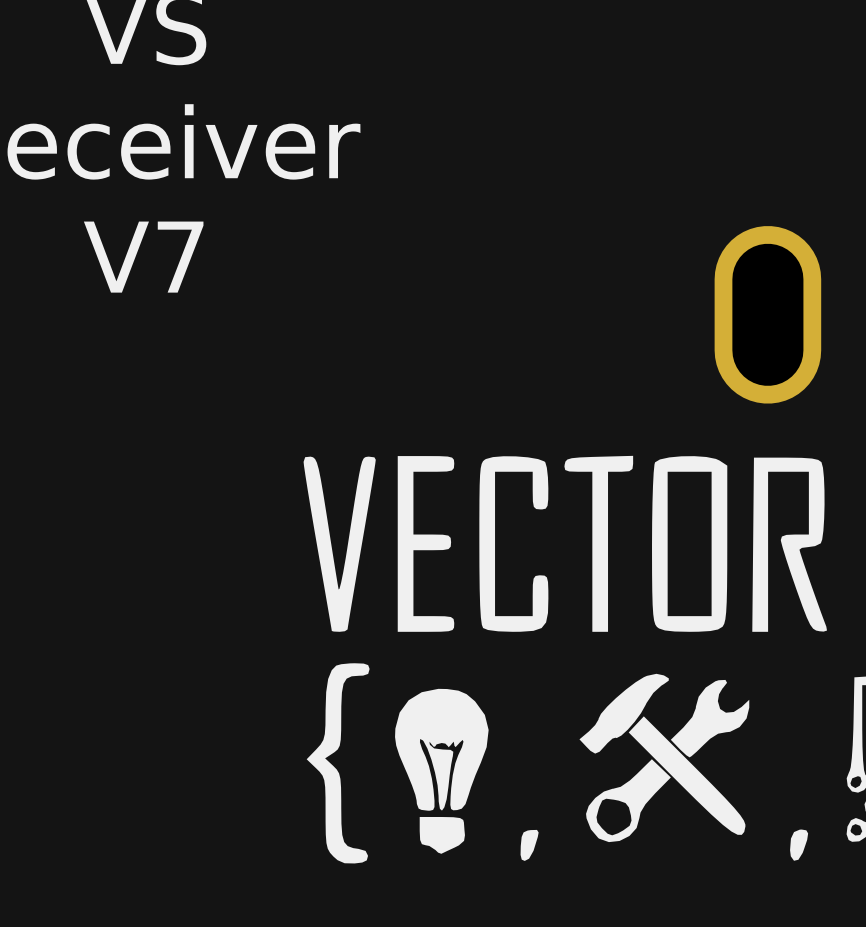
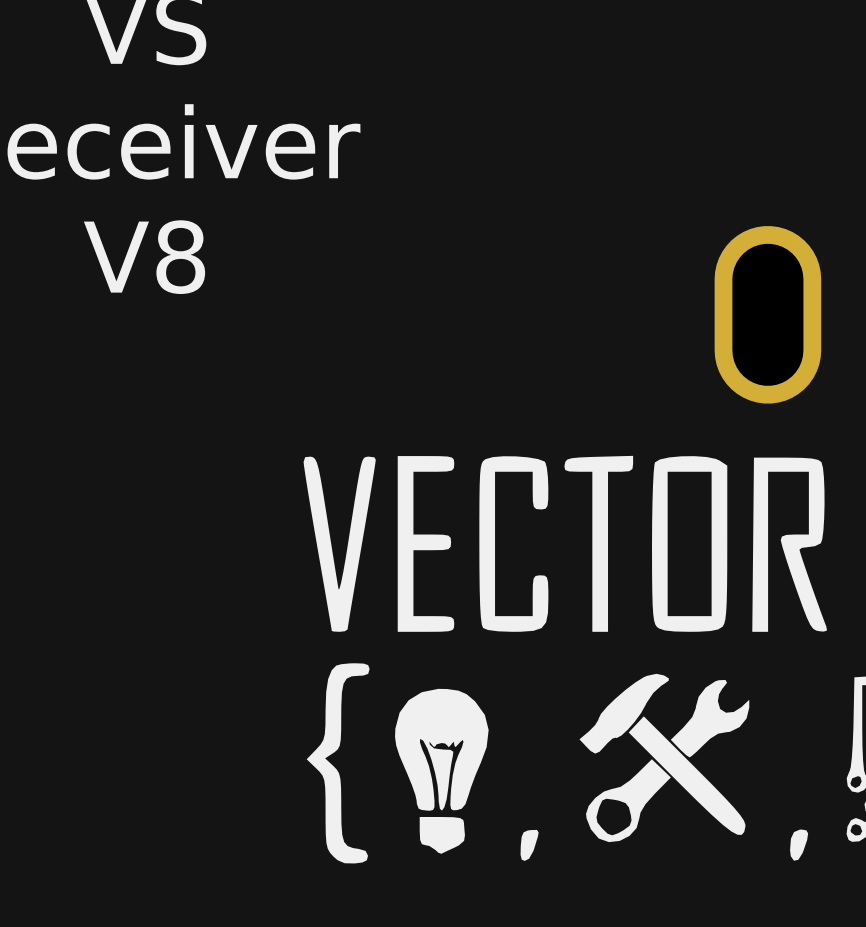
text: V7 (143, 257) -> V8 (144, 257)

